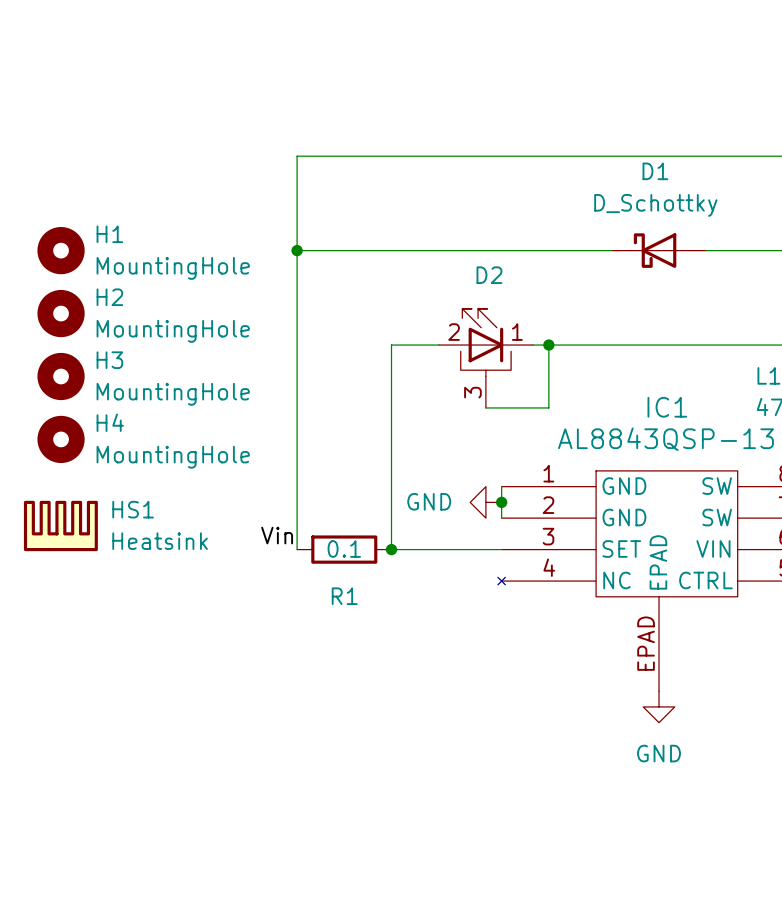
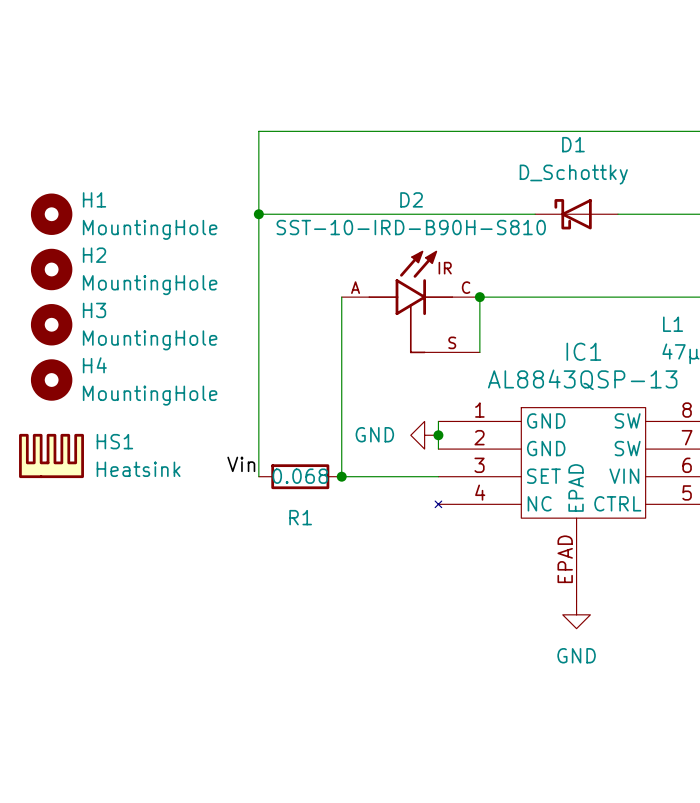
D2 value: none -> SST-10-IRD-B90H-S810 (411, 227)
D2 name position: D2 (489, 275) -> D2 (411, 199)
D2 symbol: [438, 308, 534, 408] -> [341, 250, 480, 354]
R1 value: 0.1 (344, 549) -> 0.068 (300, 476)

